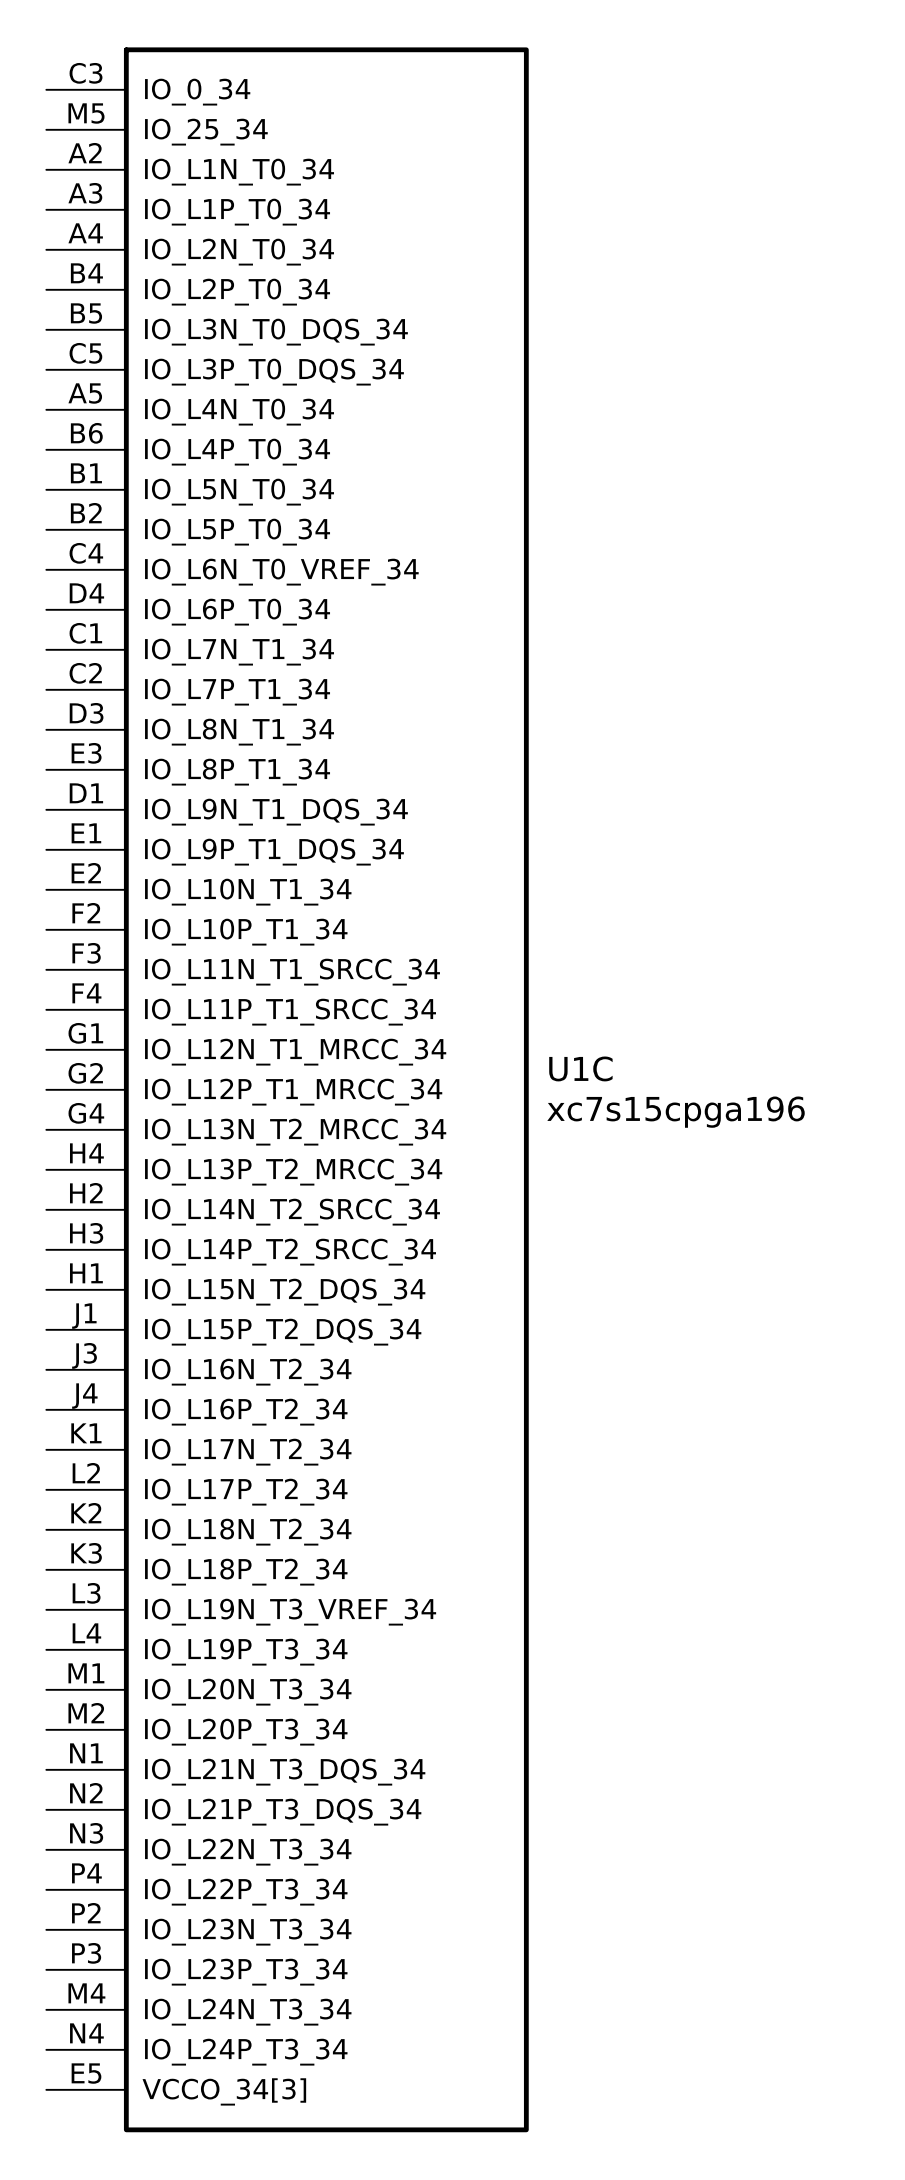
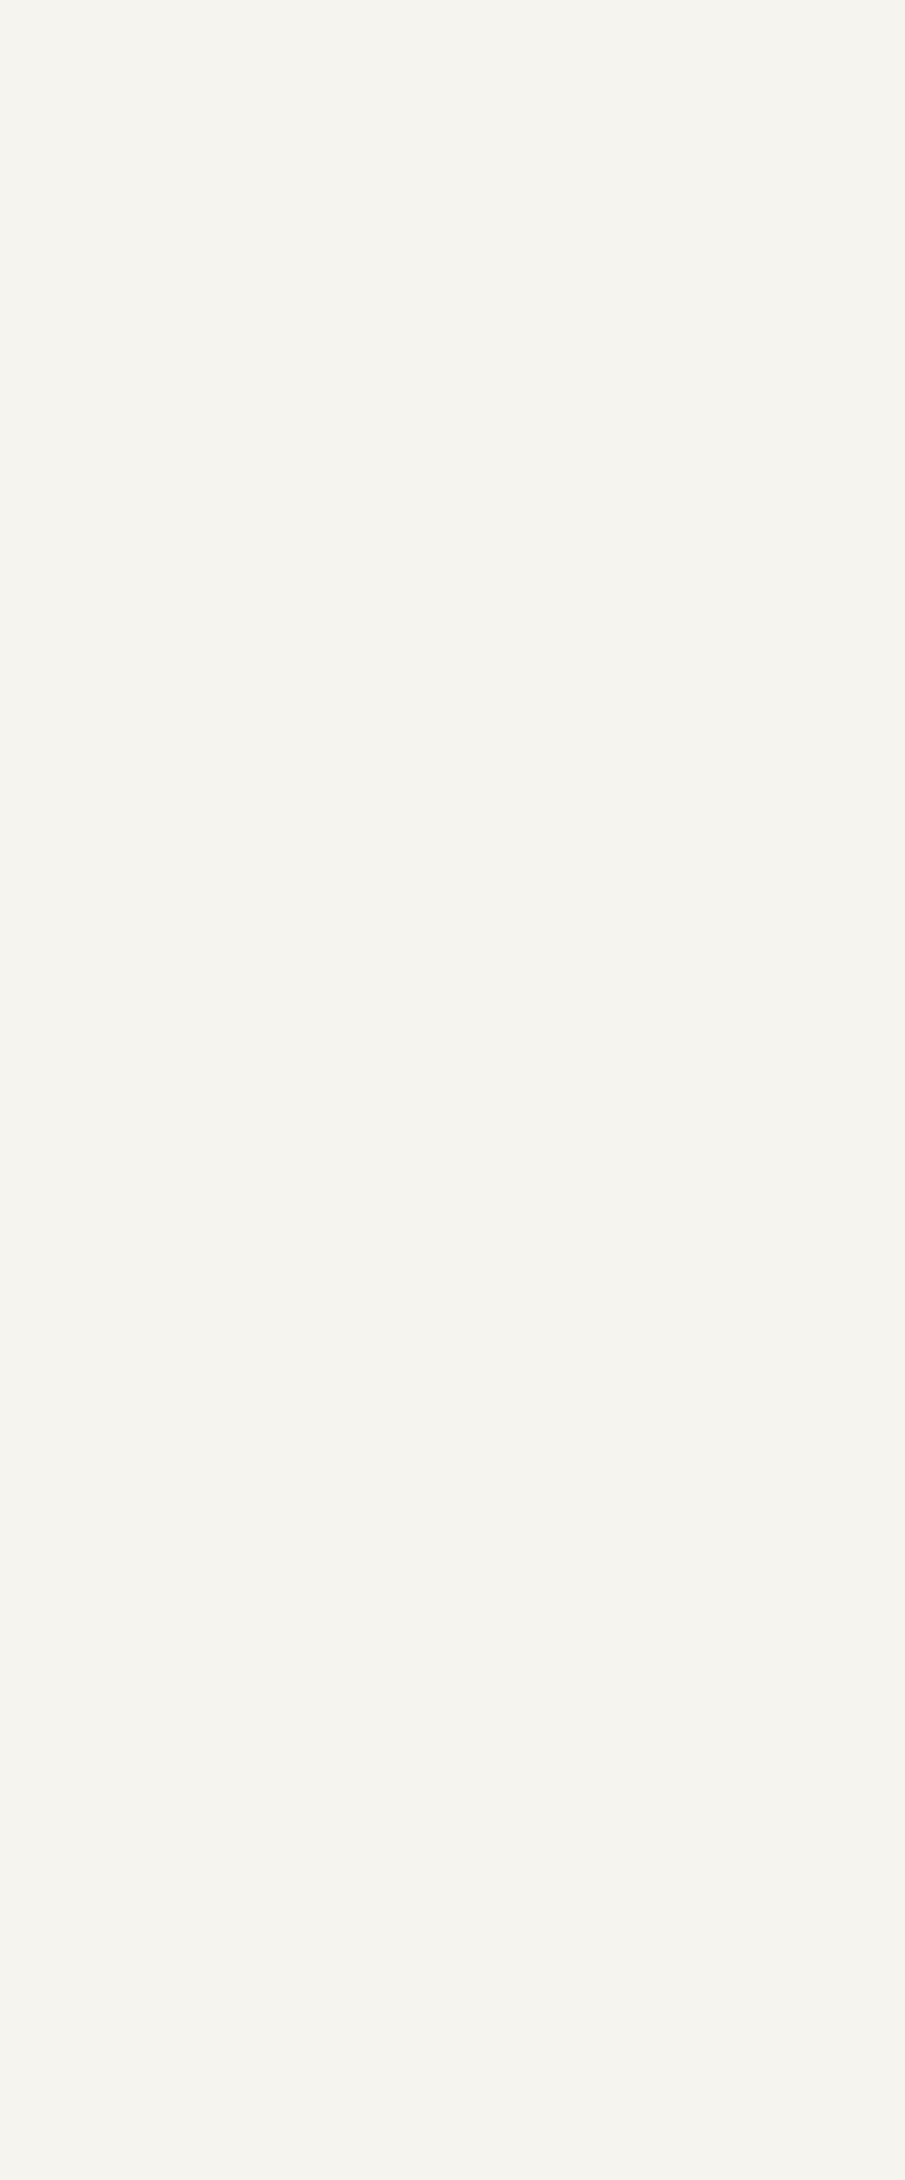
U1C: xc7s15cpga196 (287, 1089) -> none

